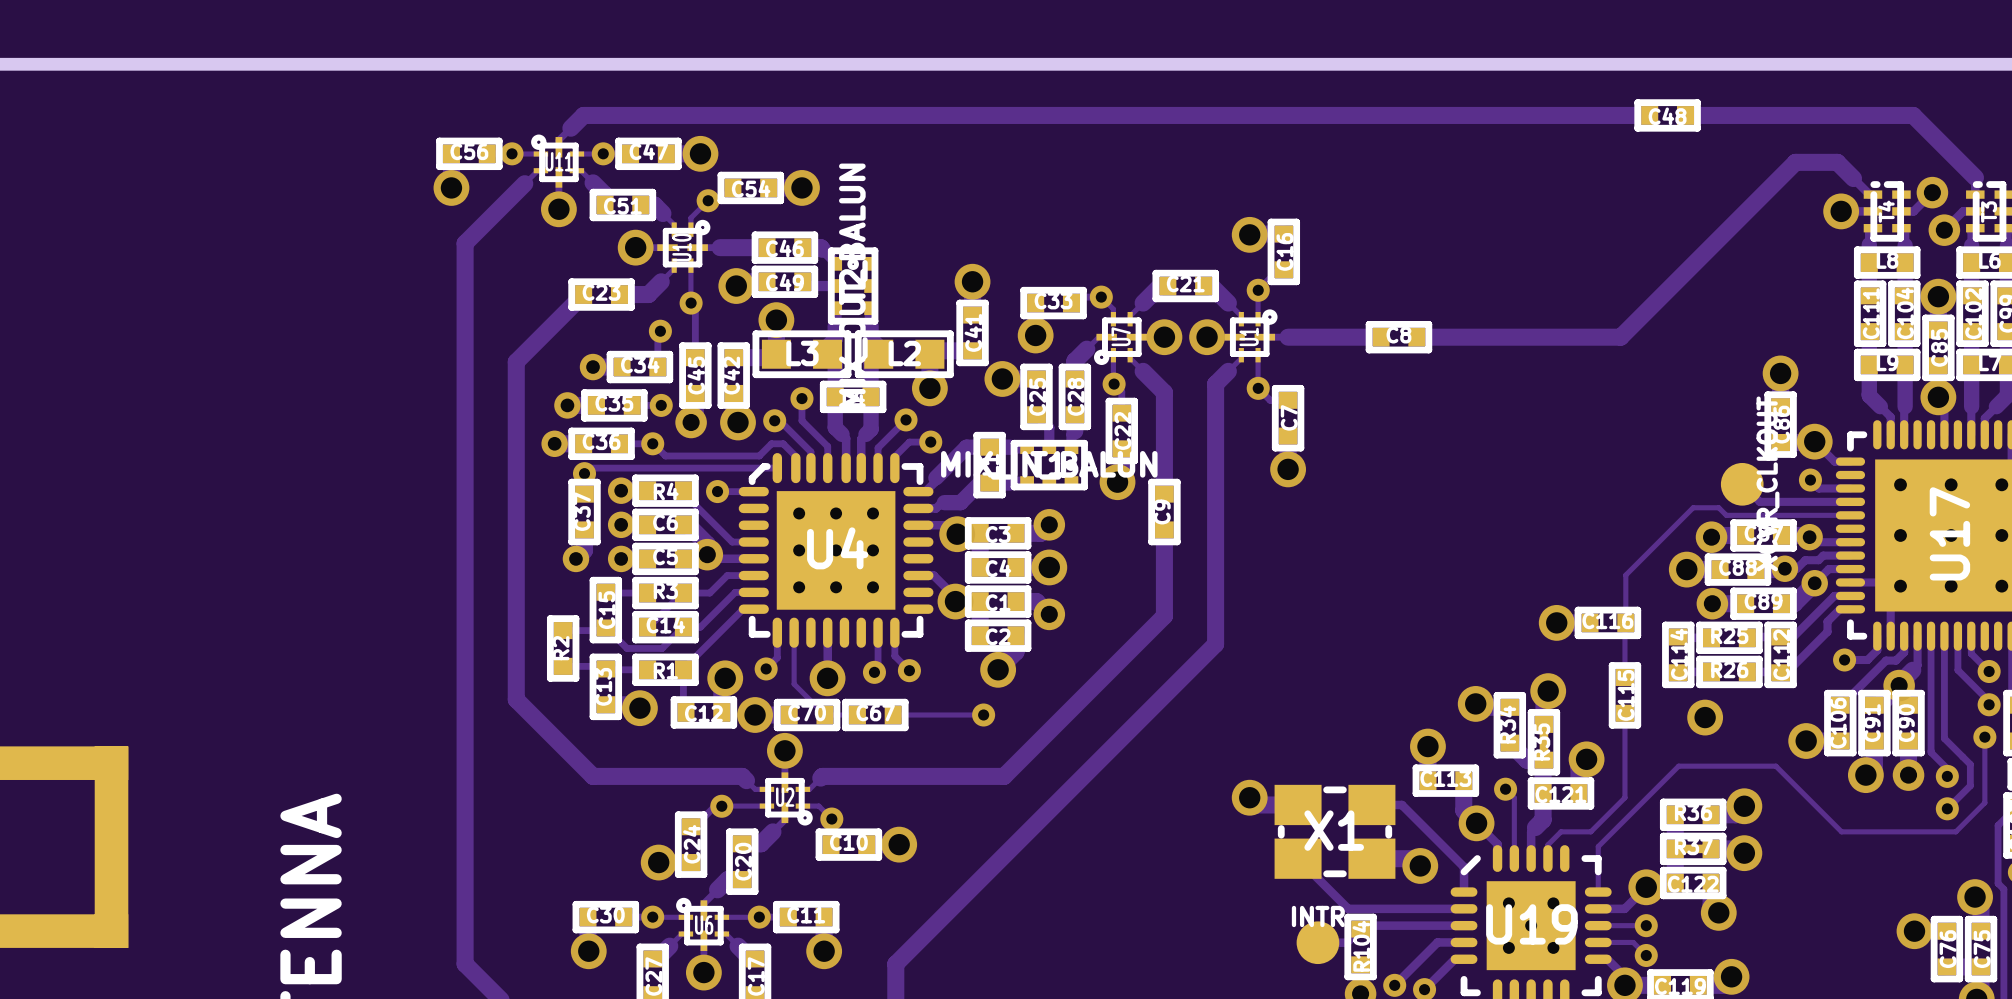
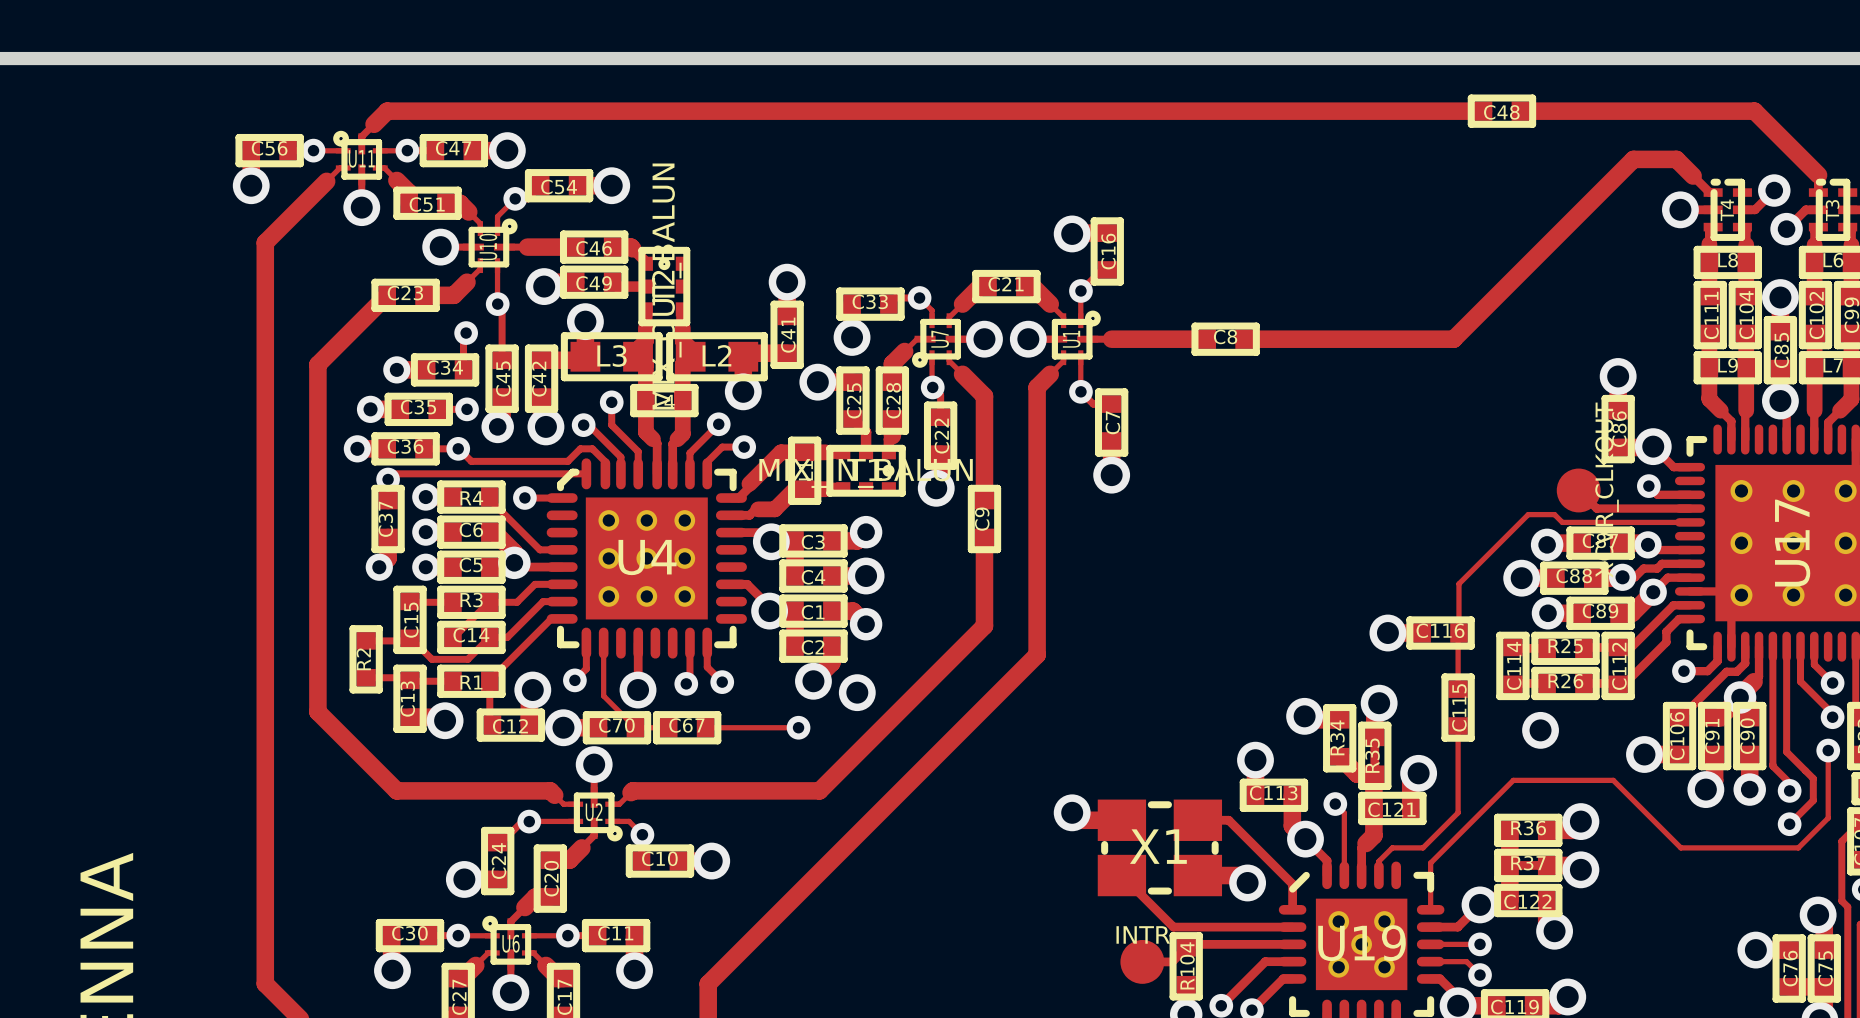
via: none -> (857, 692)

